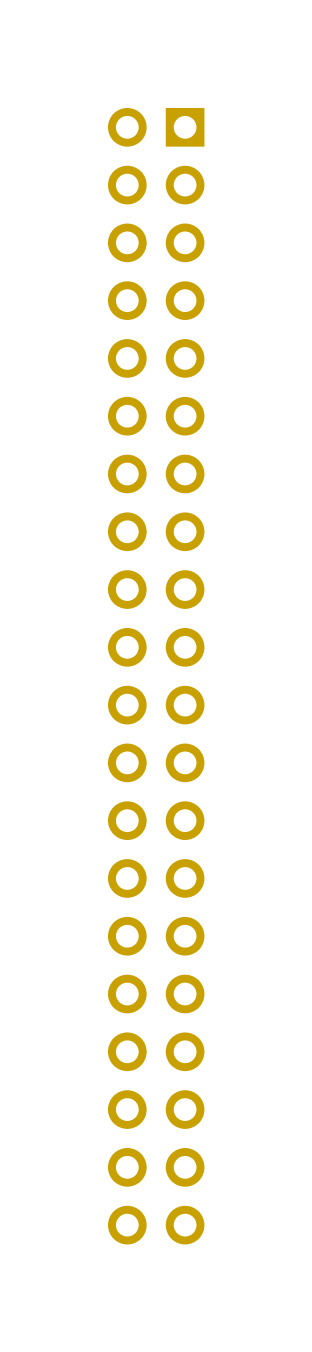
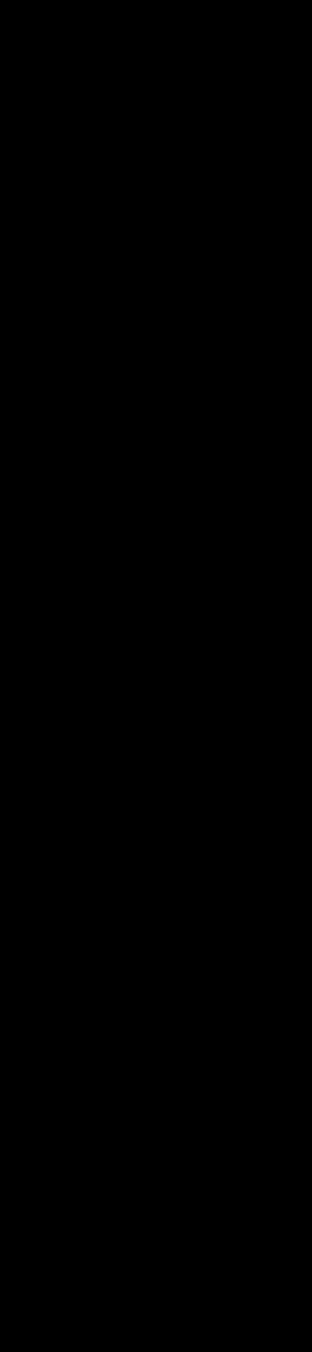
part: (156, 676) -> none

